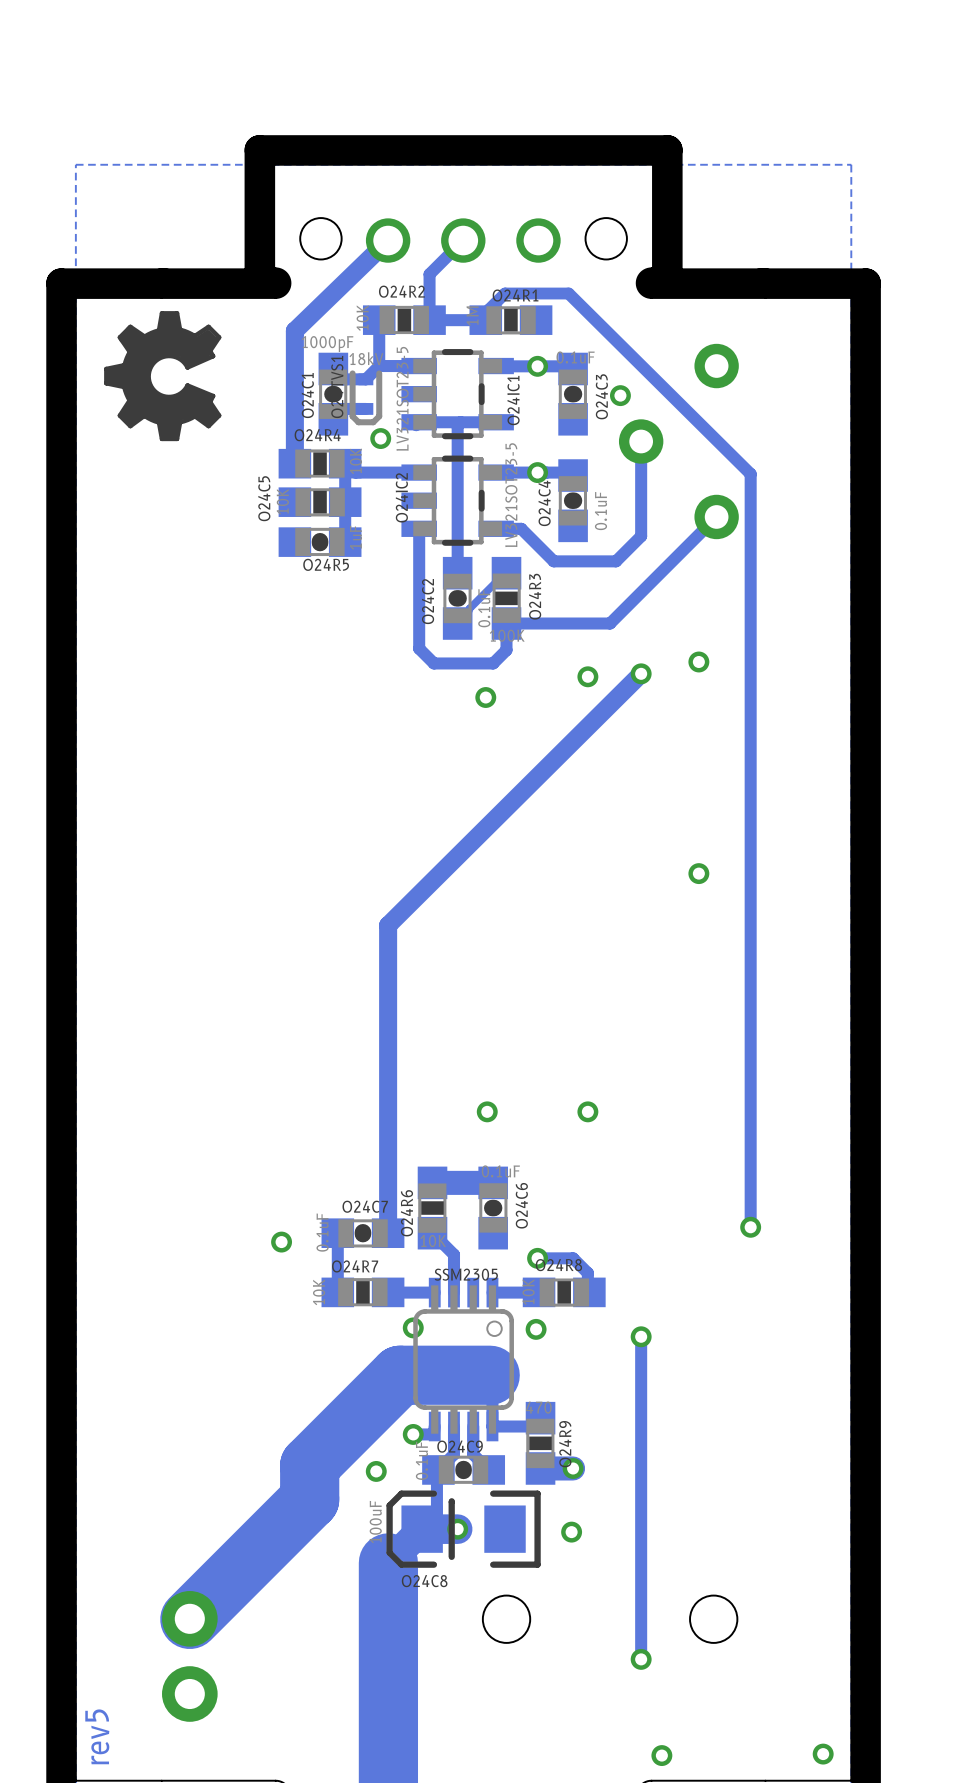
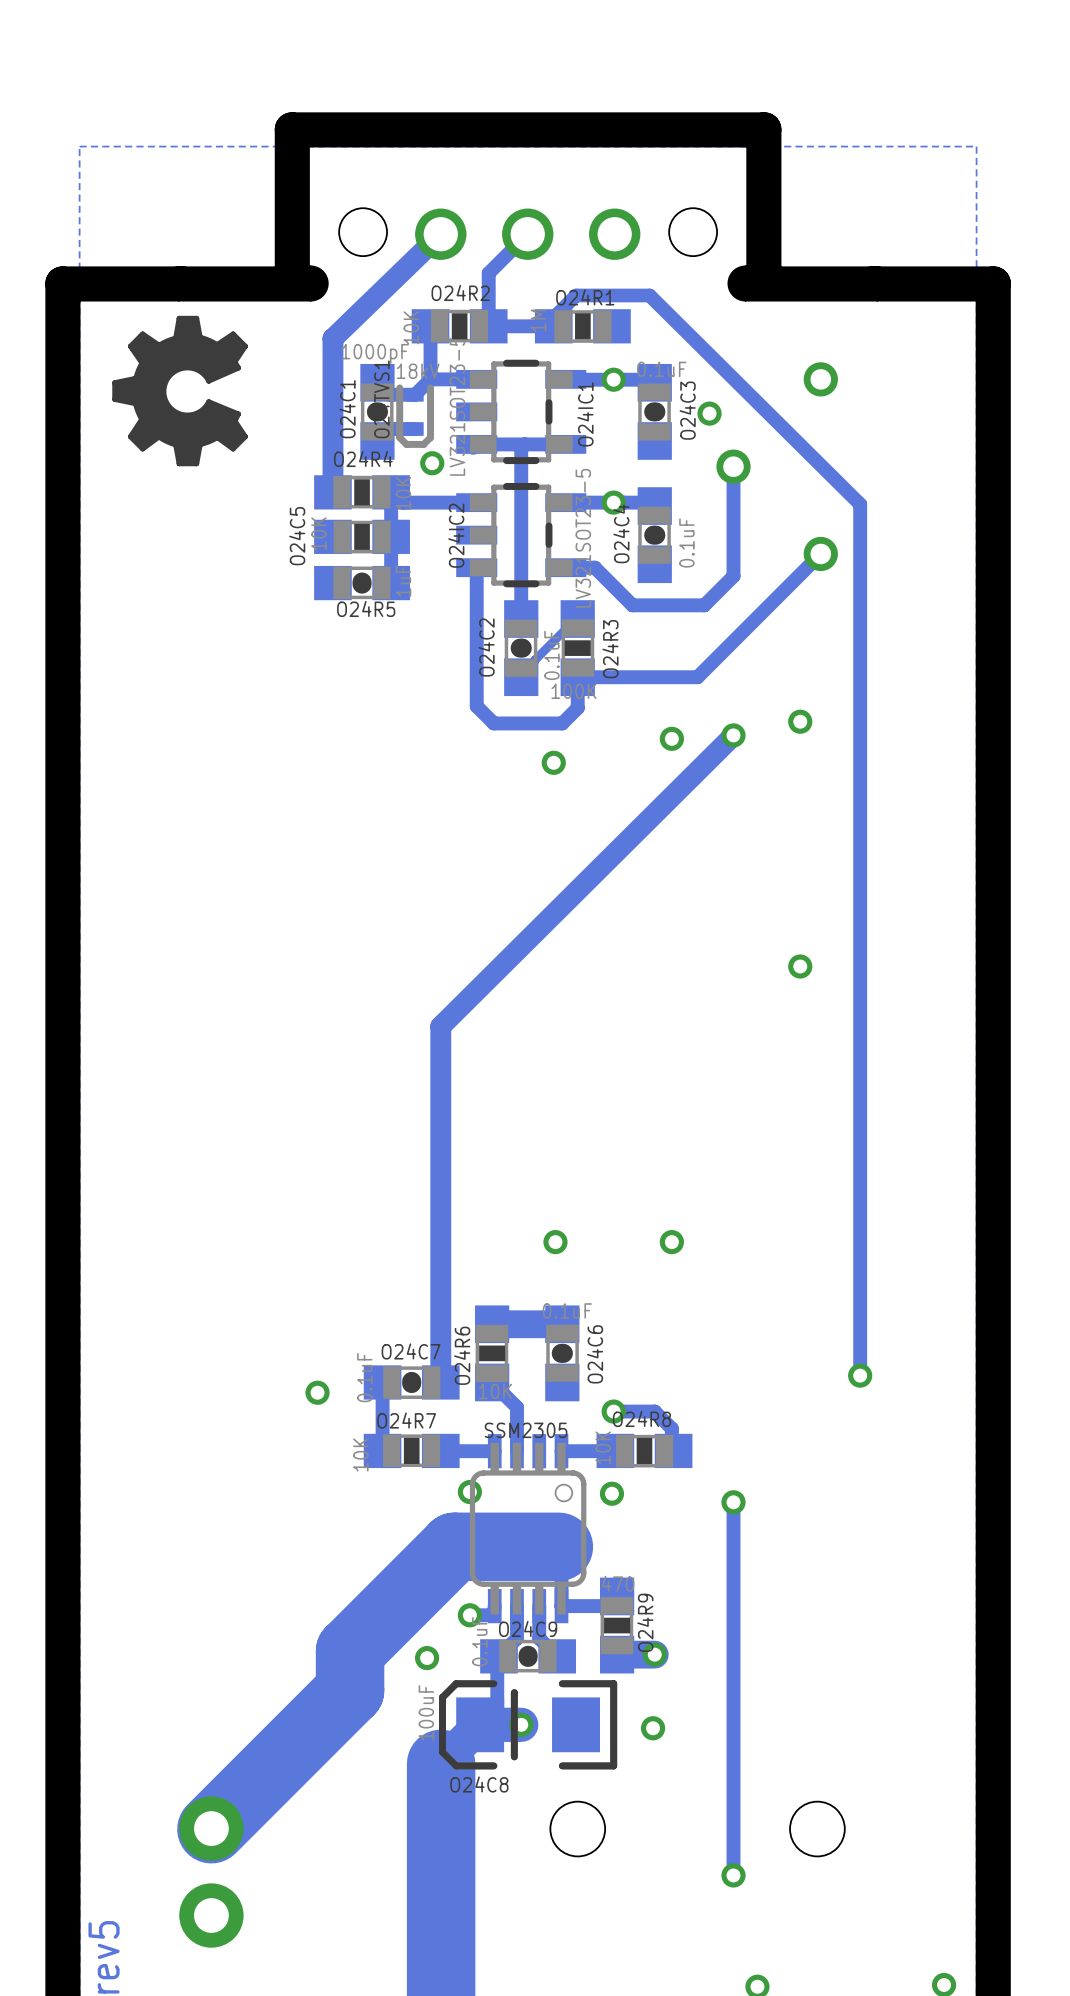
part footprint: [618, 343, 739, 540] -> [716, 362, 838, 572]

